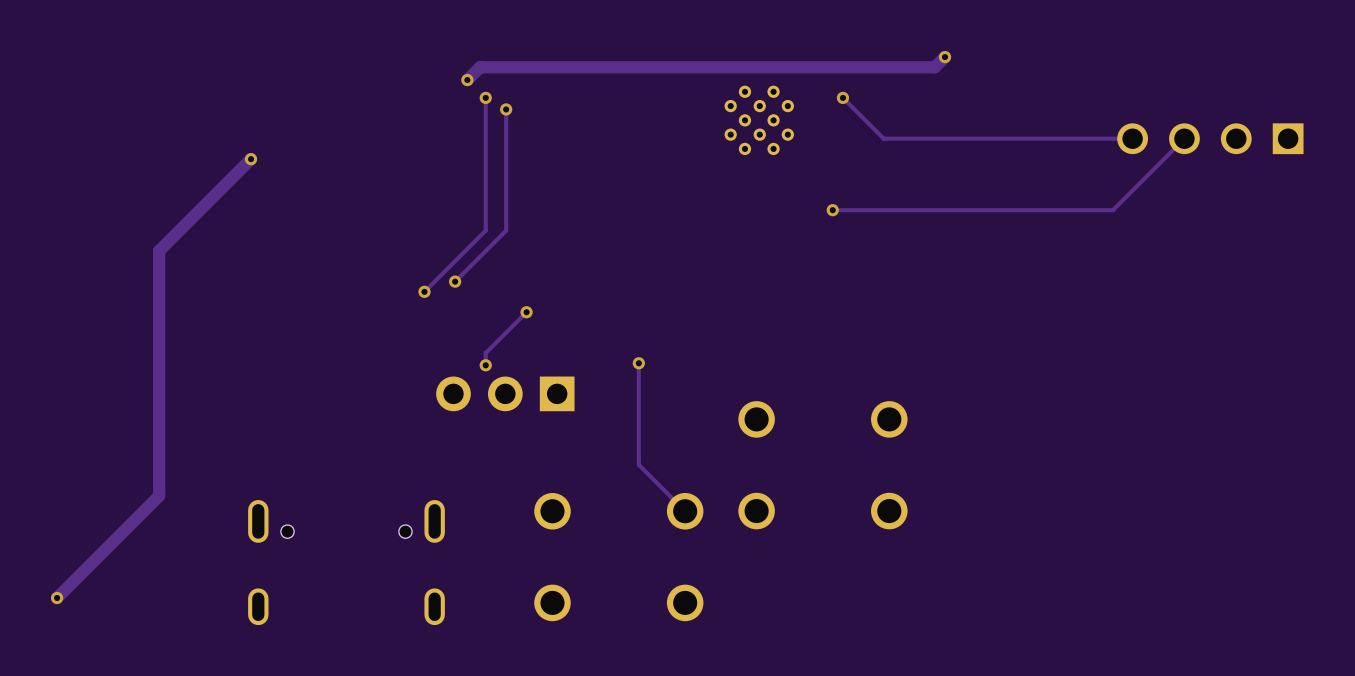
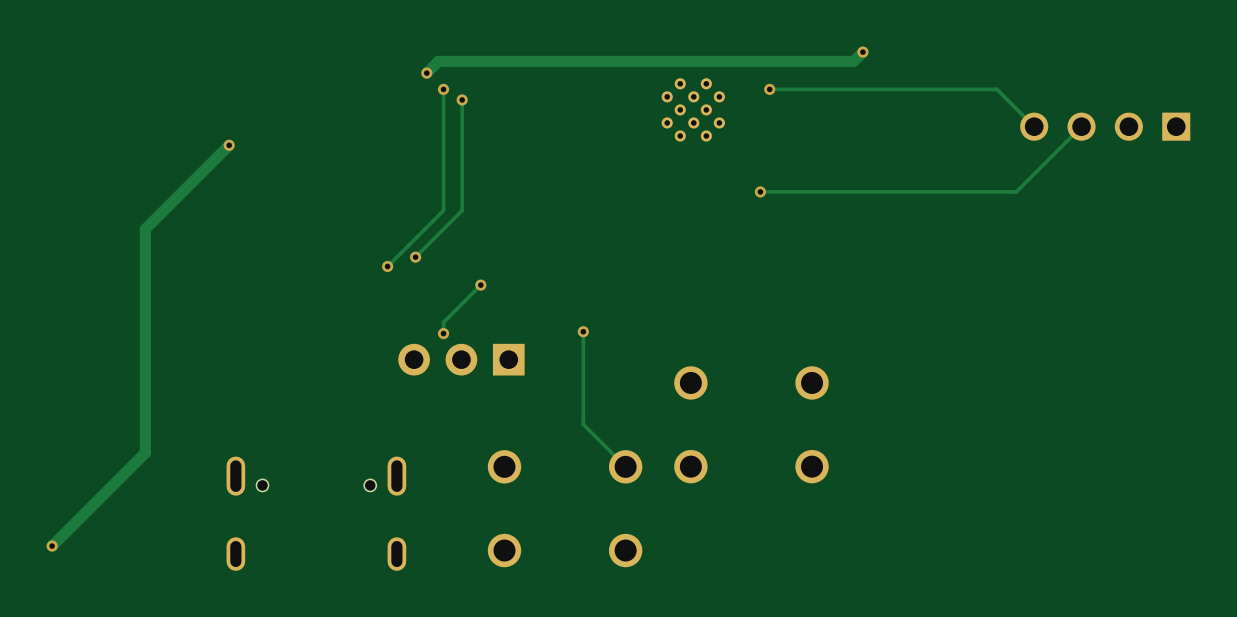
track: (842, 97) (883, 138) (1132, 138) -> (769, 89) (996, 89) (1034, 126)

